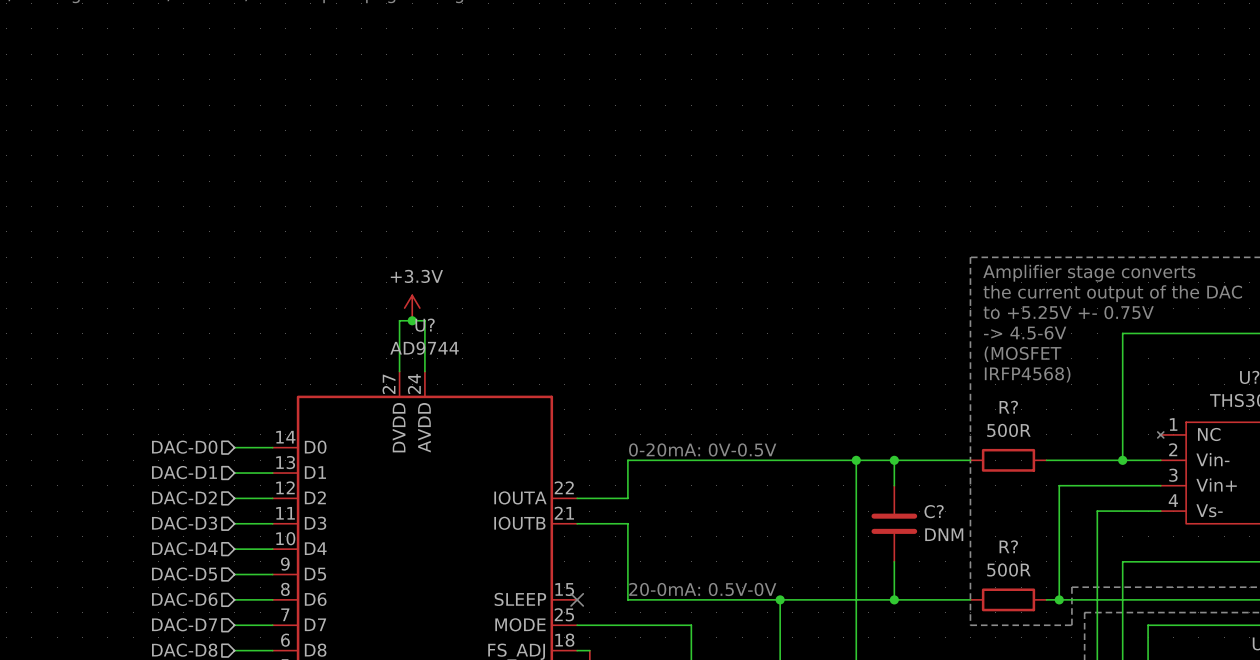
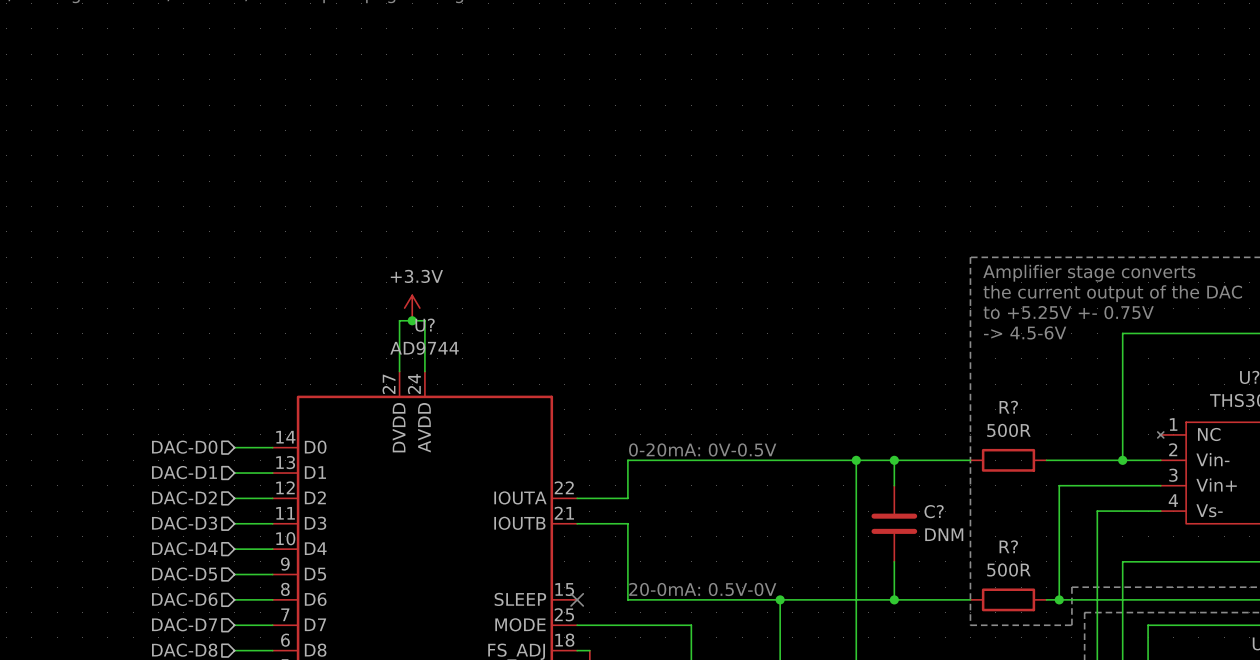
text: (MOSFET (1023, 354) -> none
text: IRFP4568) (1027, 374) -> none

